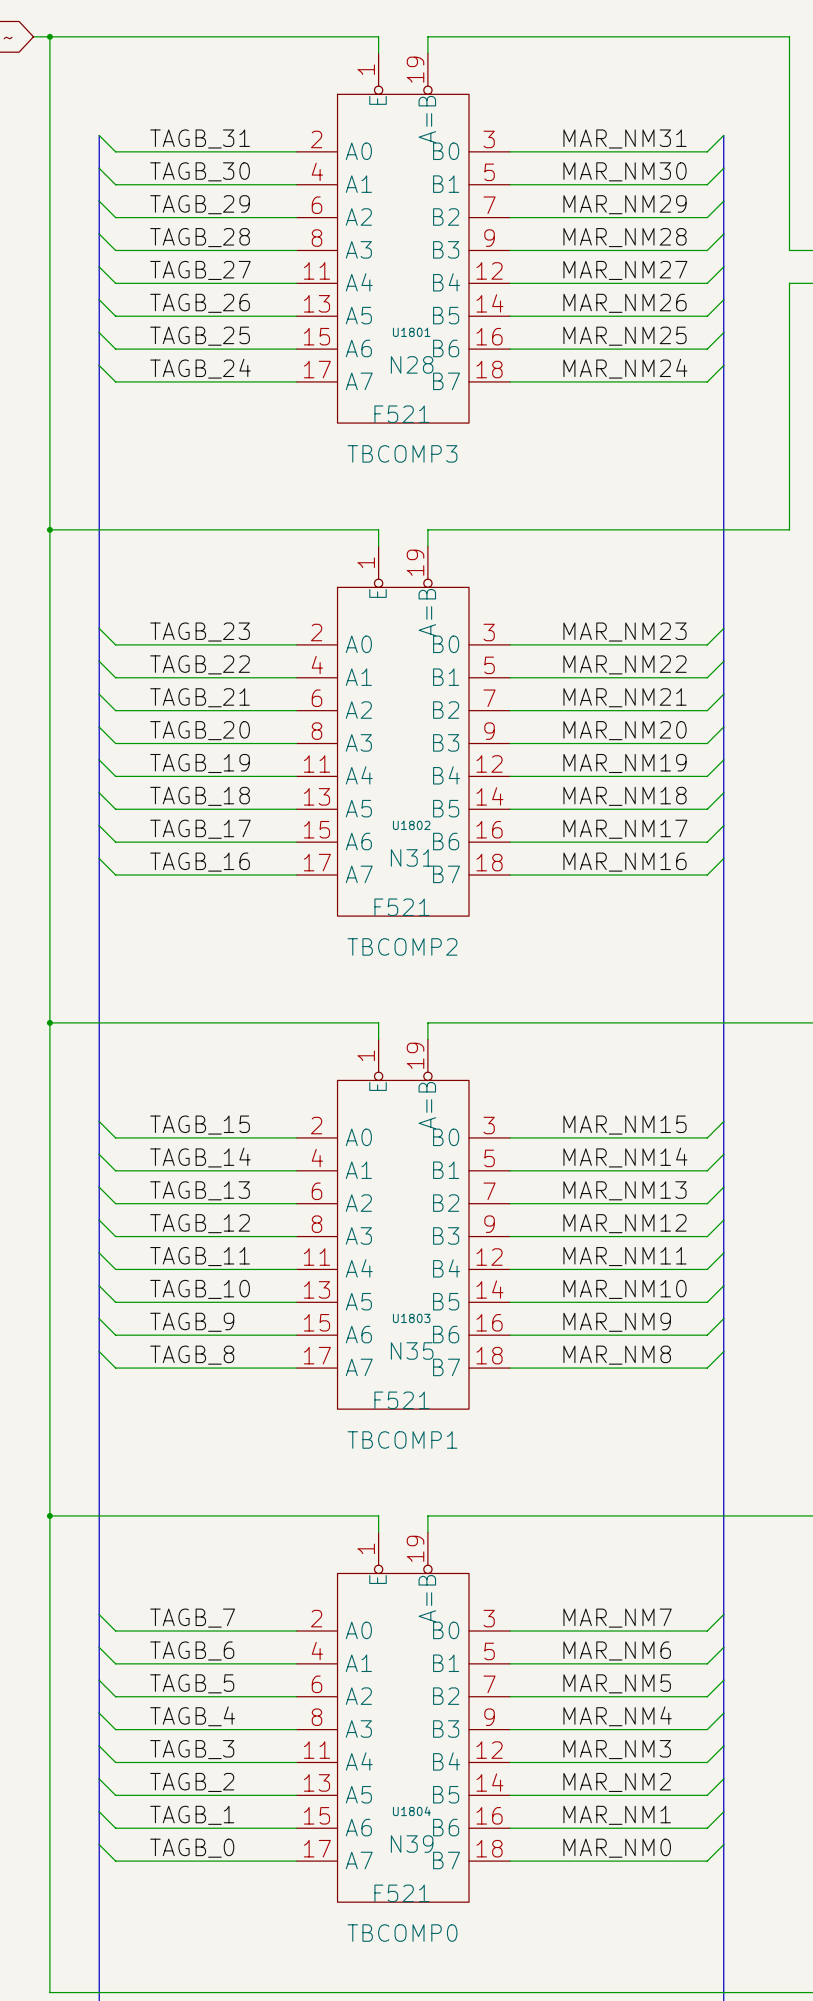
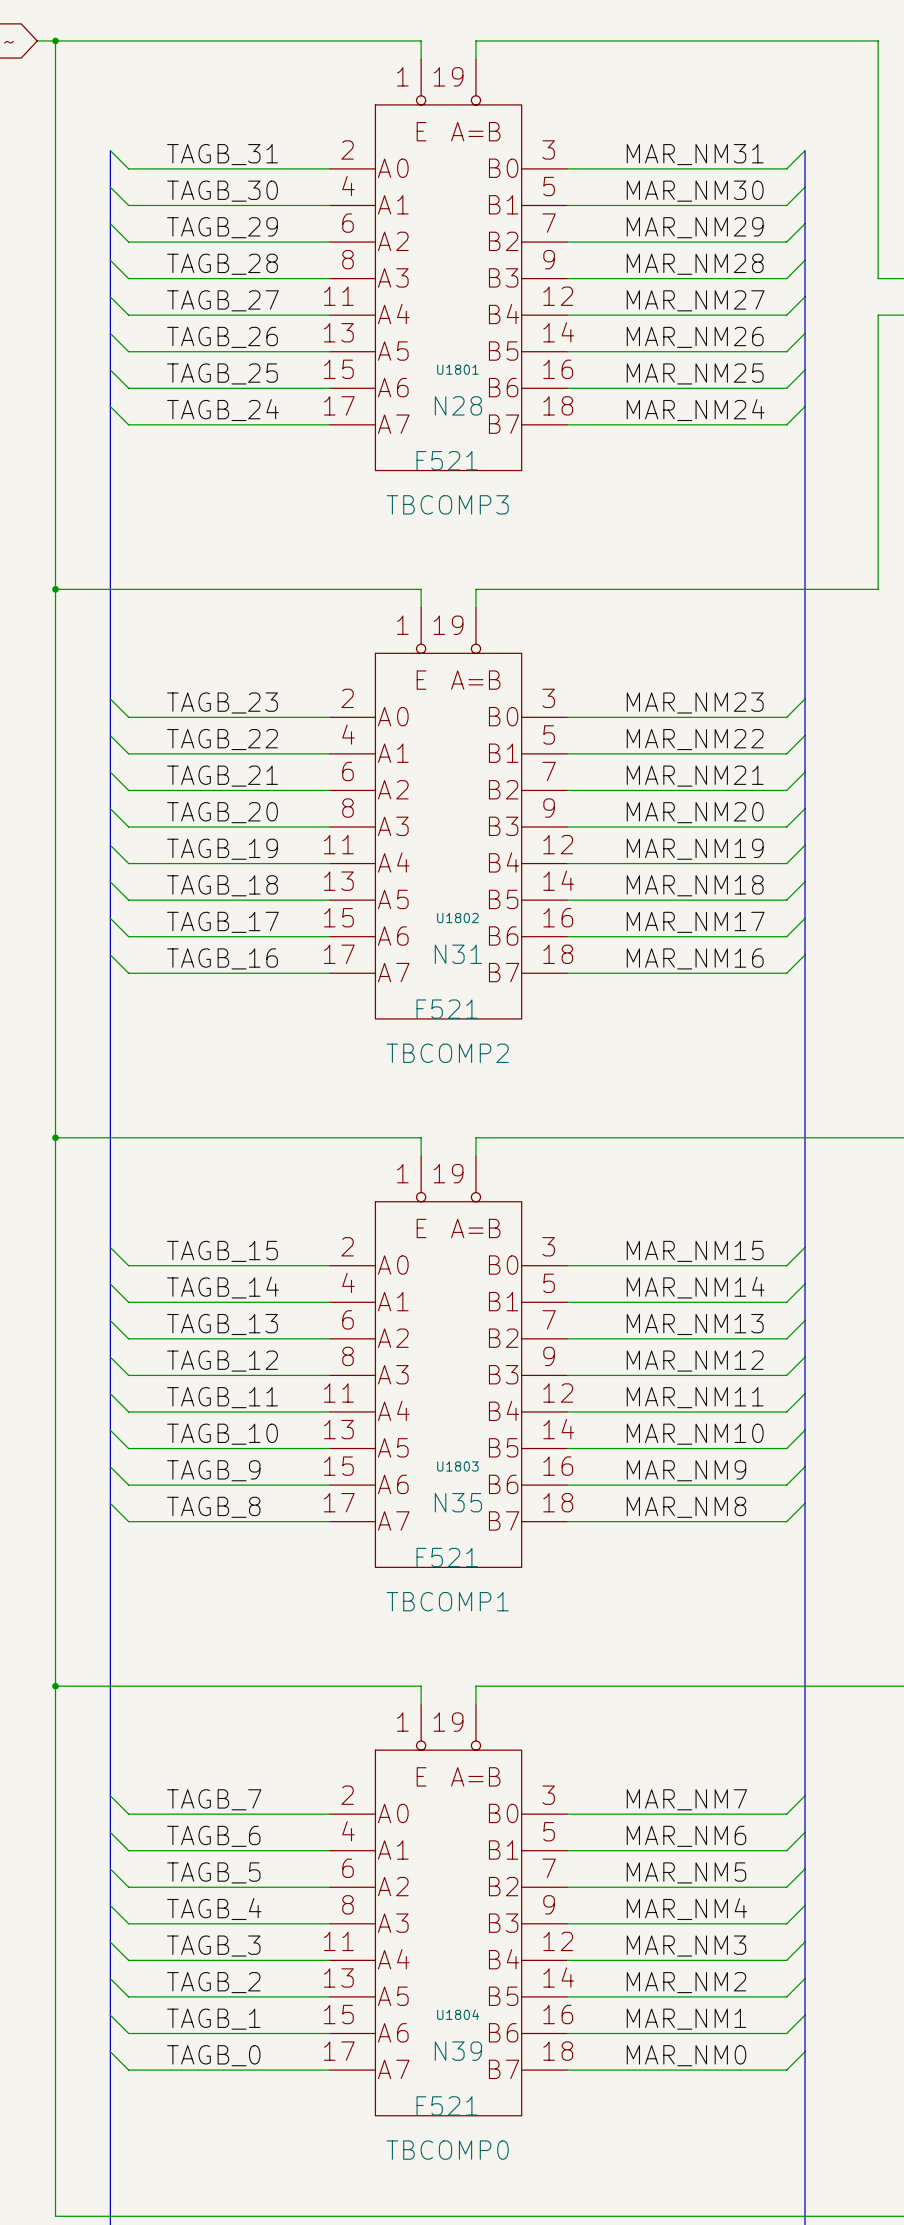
U1801 symbol: [296, 53, 511, 424] -> [329, 59, 568, 471]
U1802 symbol: [296, 546, 511, 917] -> [329, 607, 568, 1019]
U1803 symbol: [296, 1039, 511, 1410] -> [329, 1156, 568, 1568]
U1804 symbol: [296, 1532, 511, 1903] -> [329, 1704, 568, 2116]

